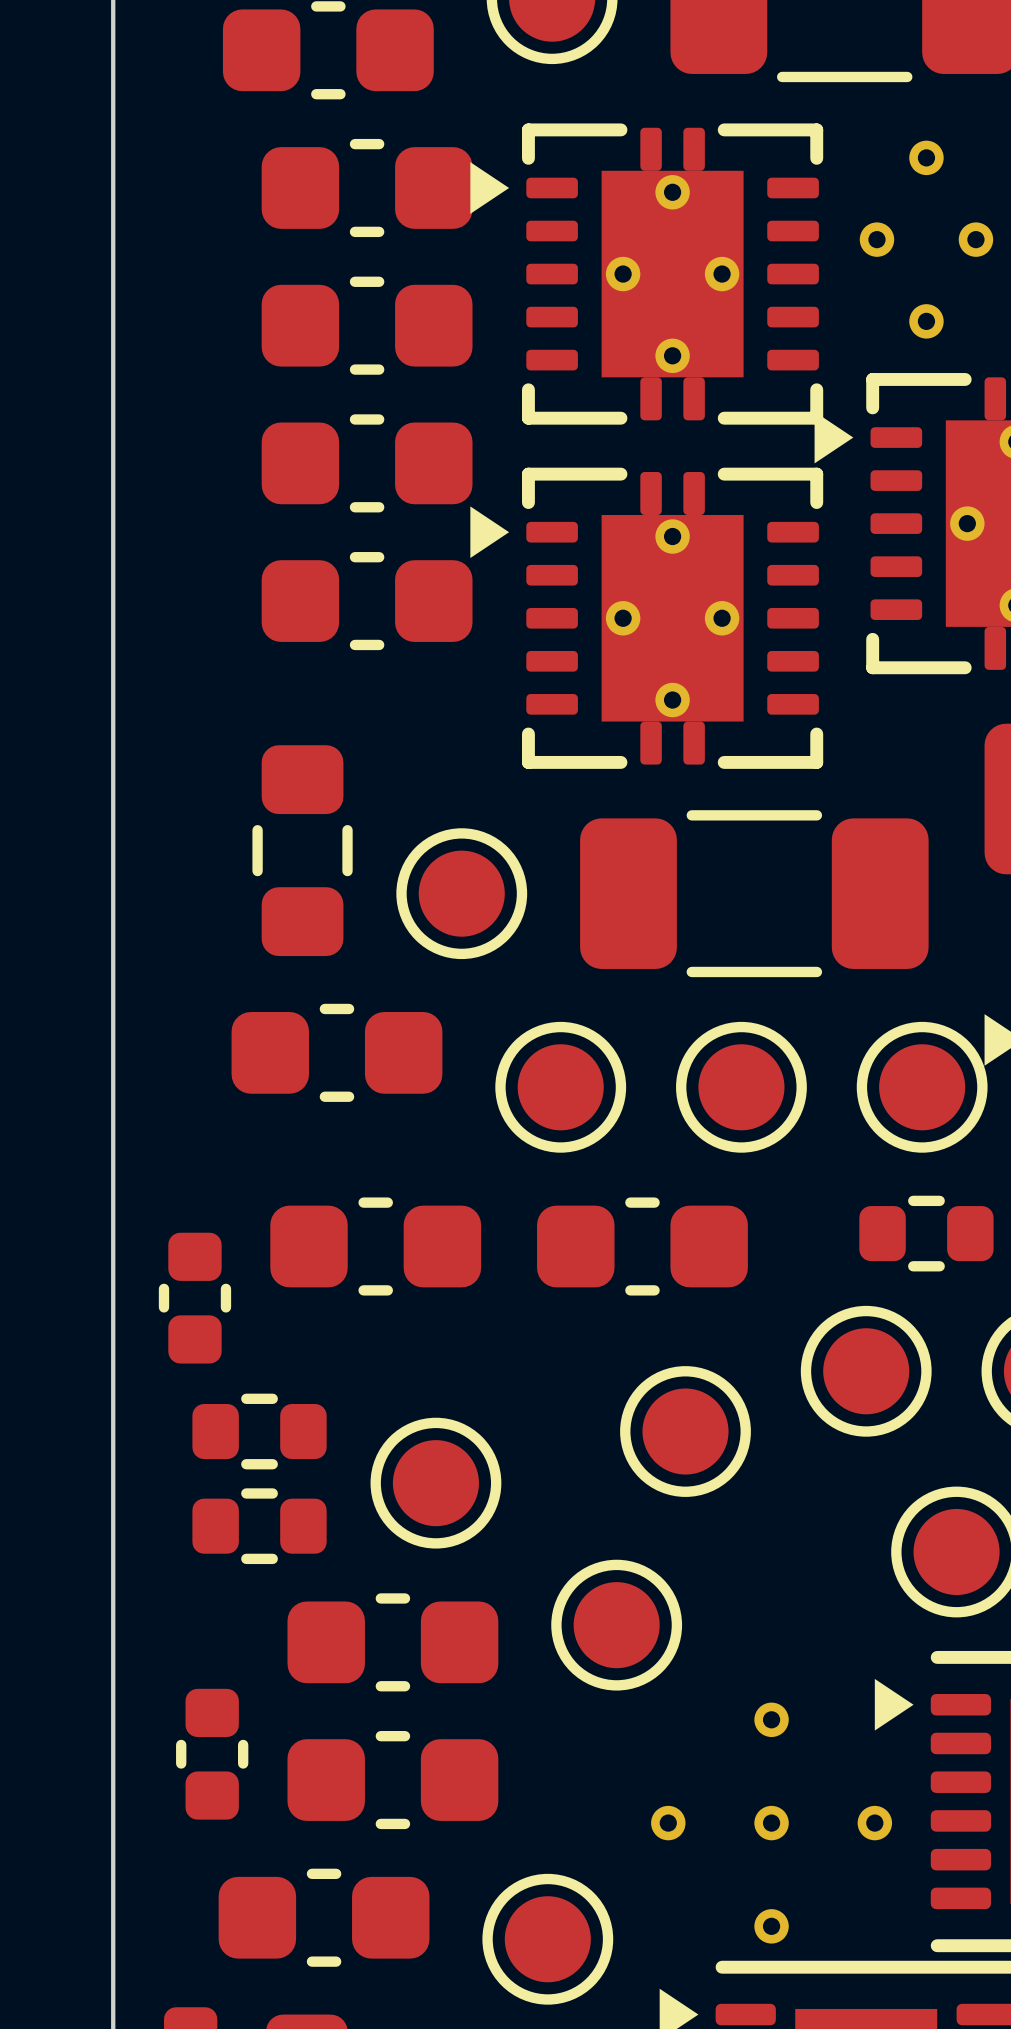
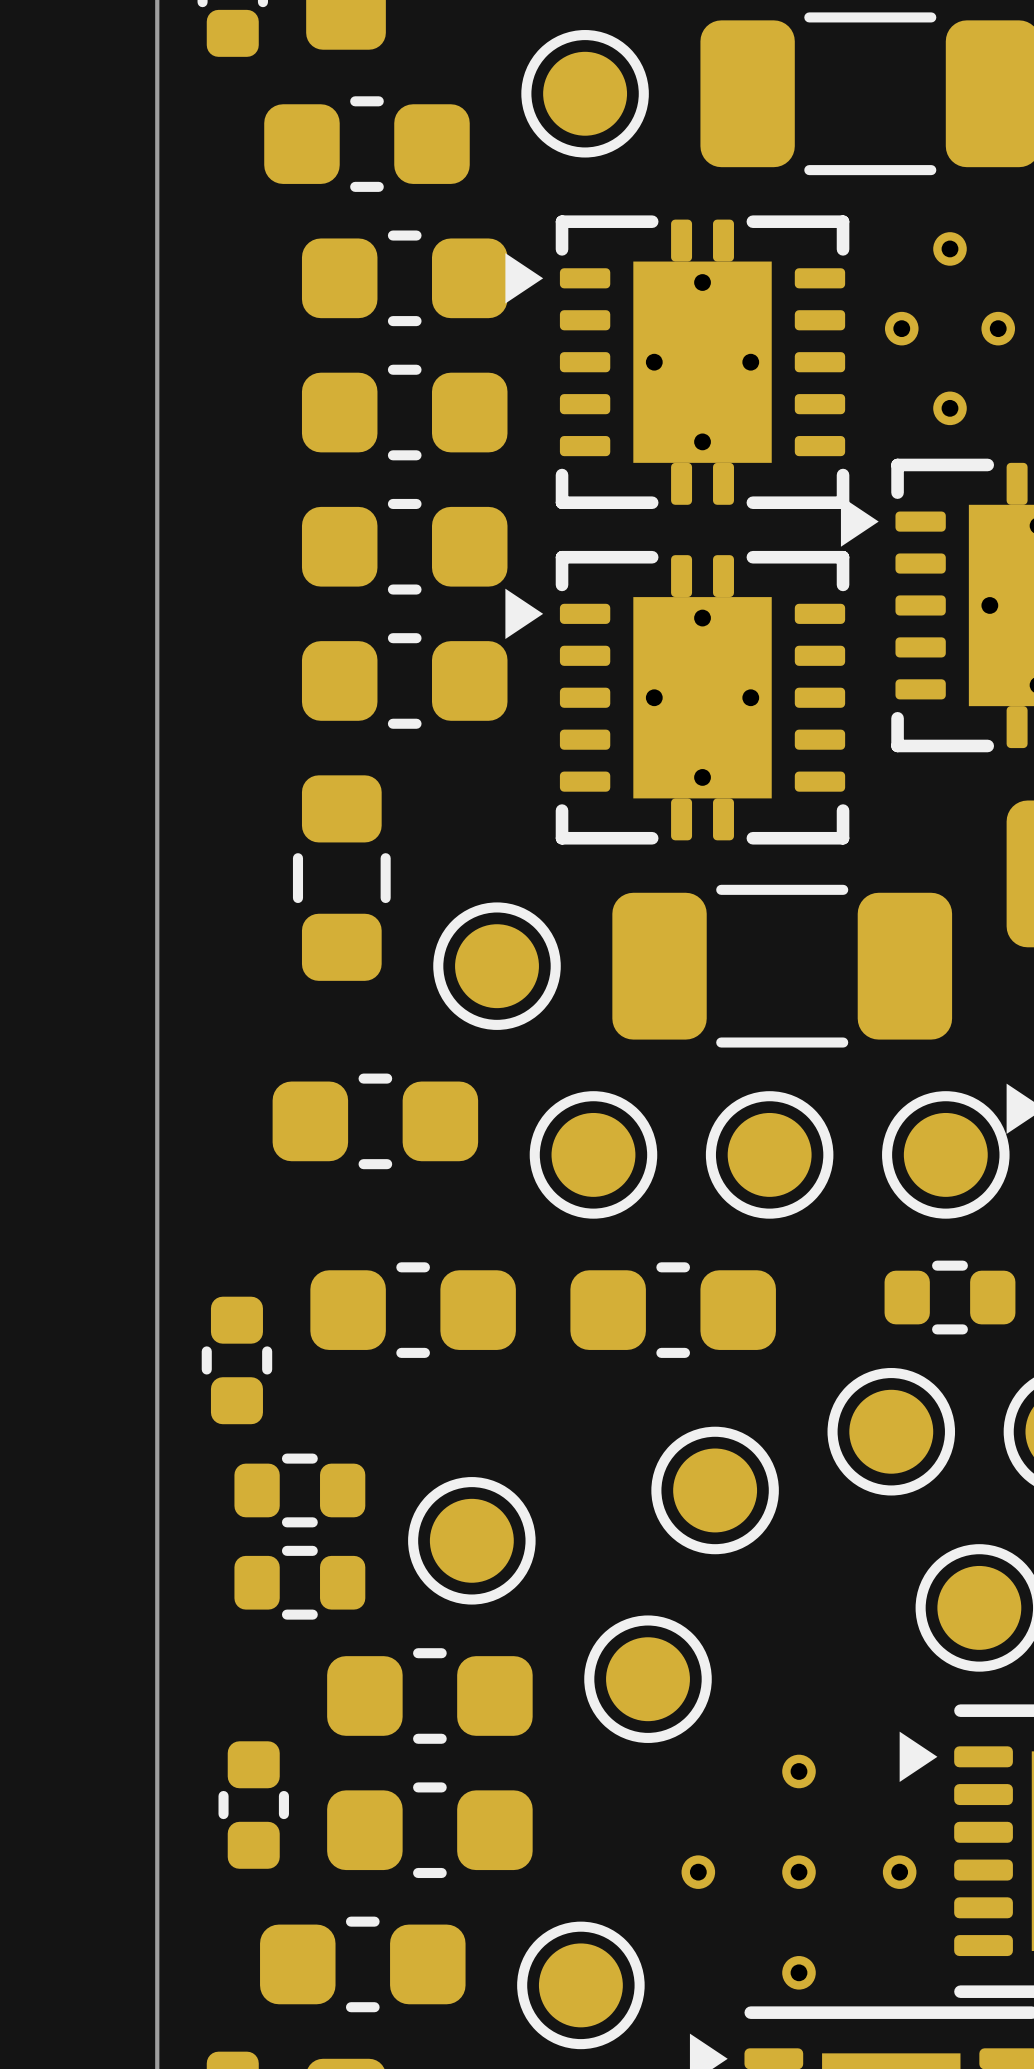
part position: (302, 850) -> (341, 878)

